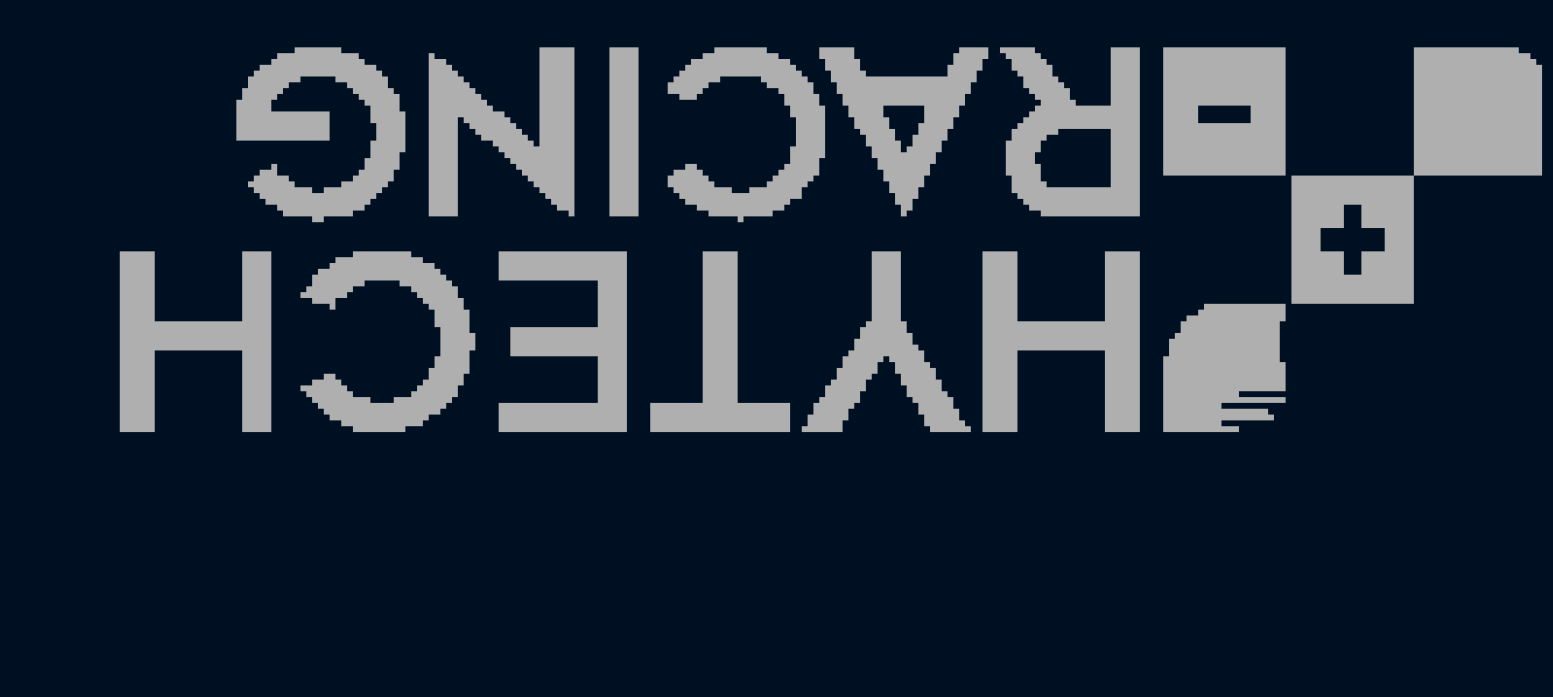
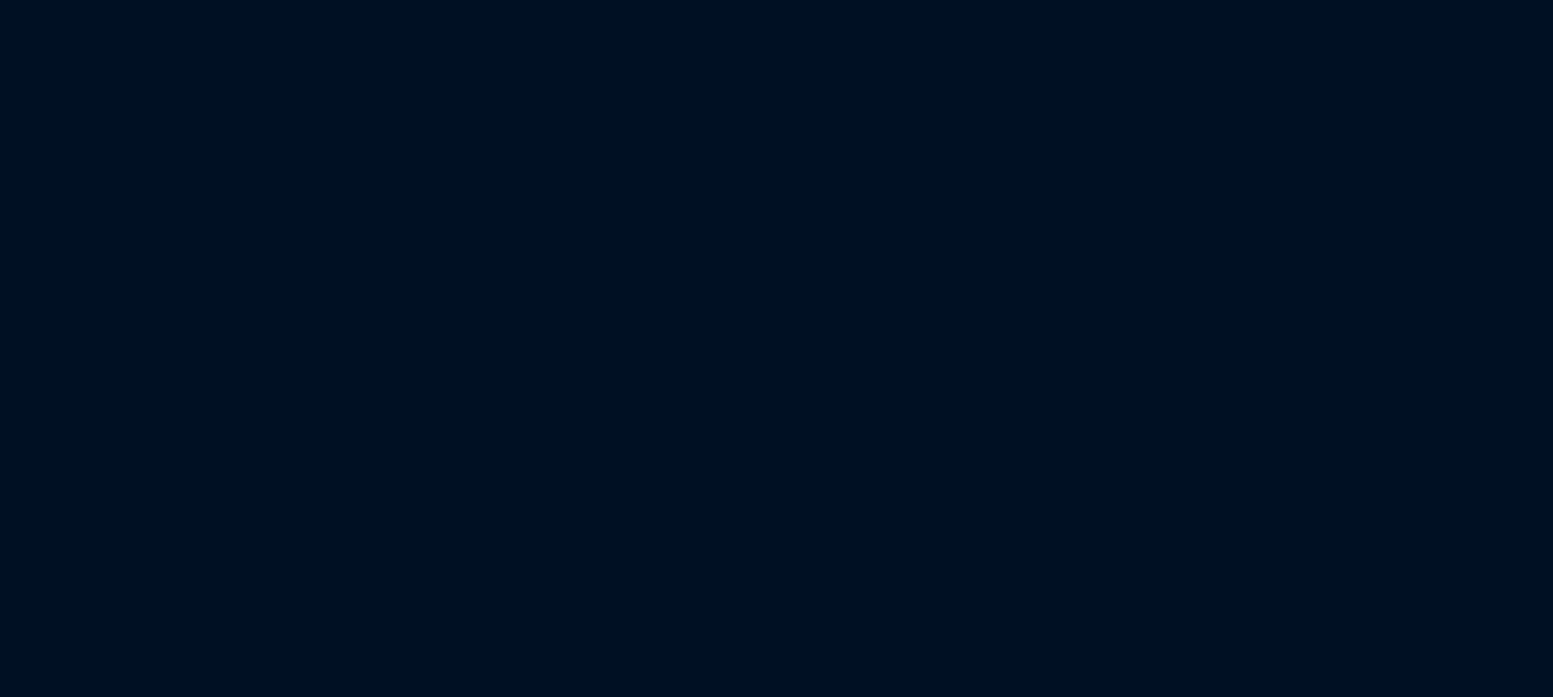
drawing: [119, 47, 1543, 433] -> none

